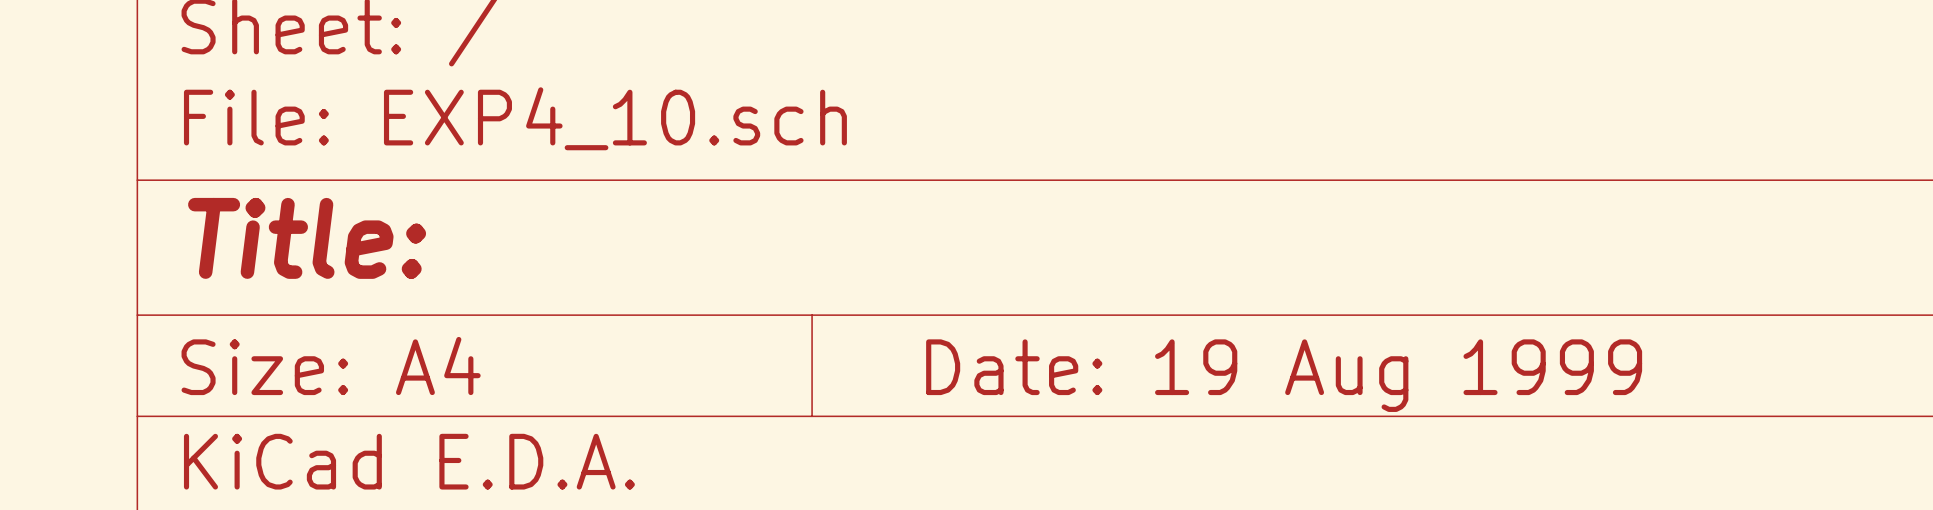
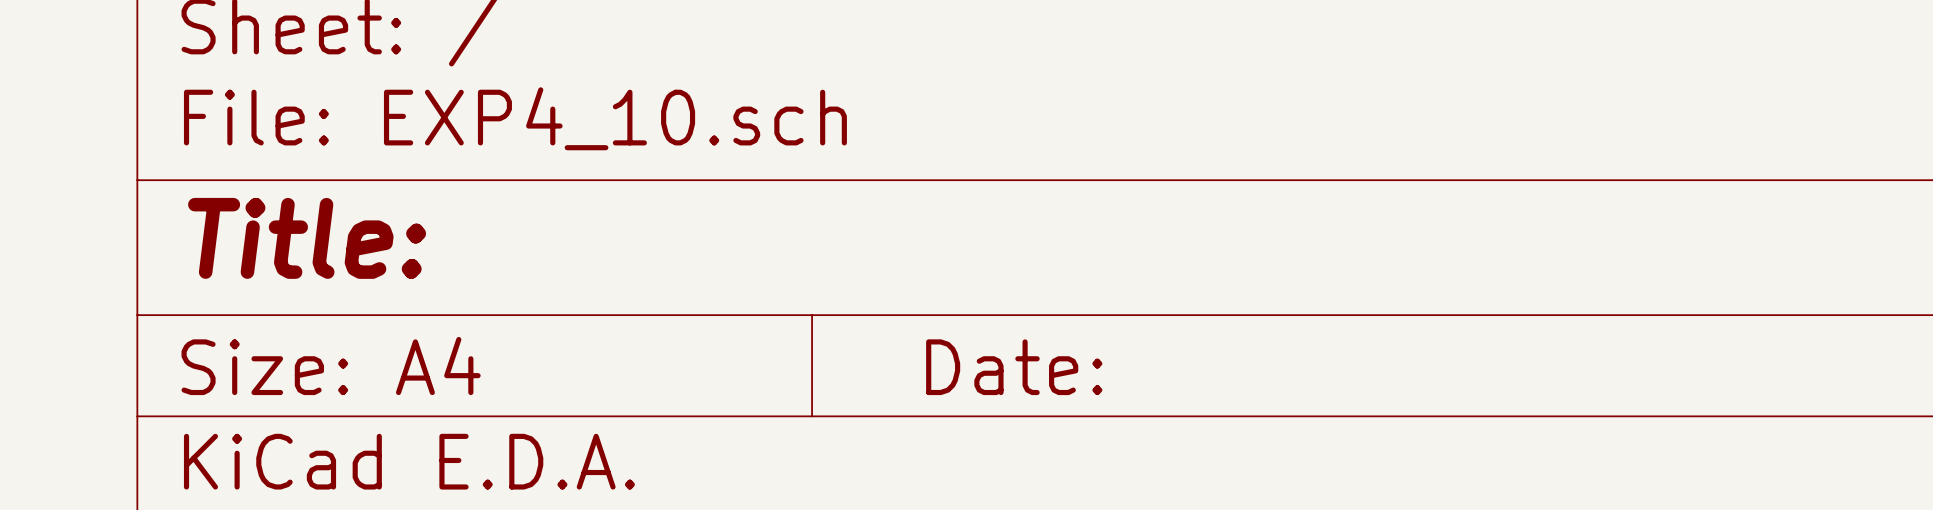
title block: Date: 19 Aug 1999 (1284, 375) -> Date: (1014, 367)

